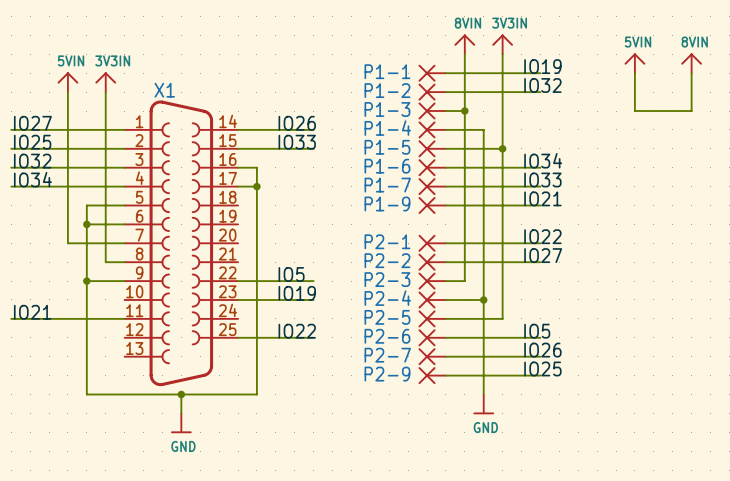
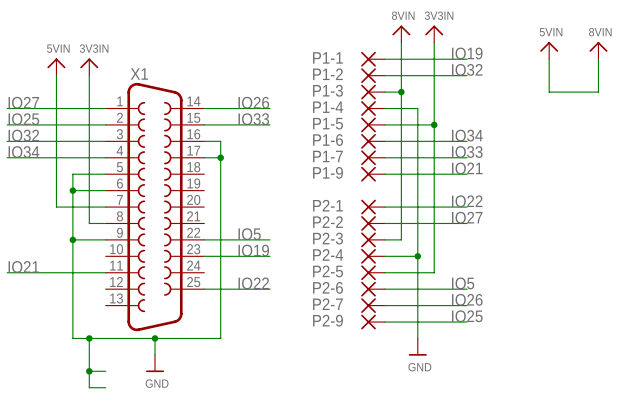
wire: none -> (89, 338) (89, 387) (105, 387)
junction: none -> (89, 338)
wire: none -> (89, 371) (105, 371)
junction: none -> (89, 371)

